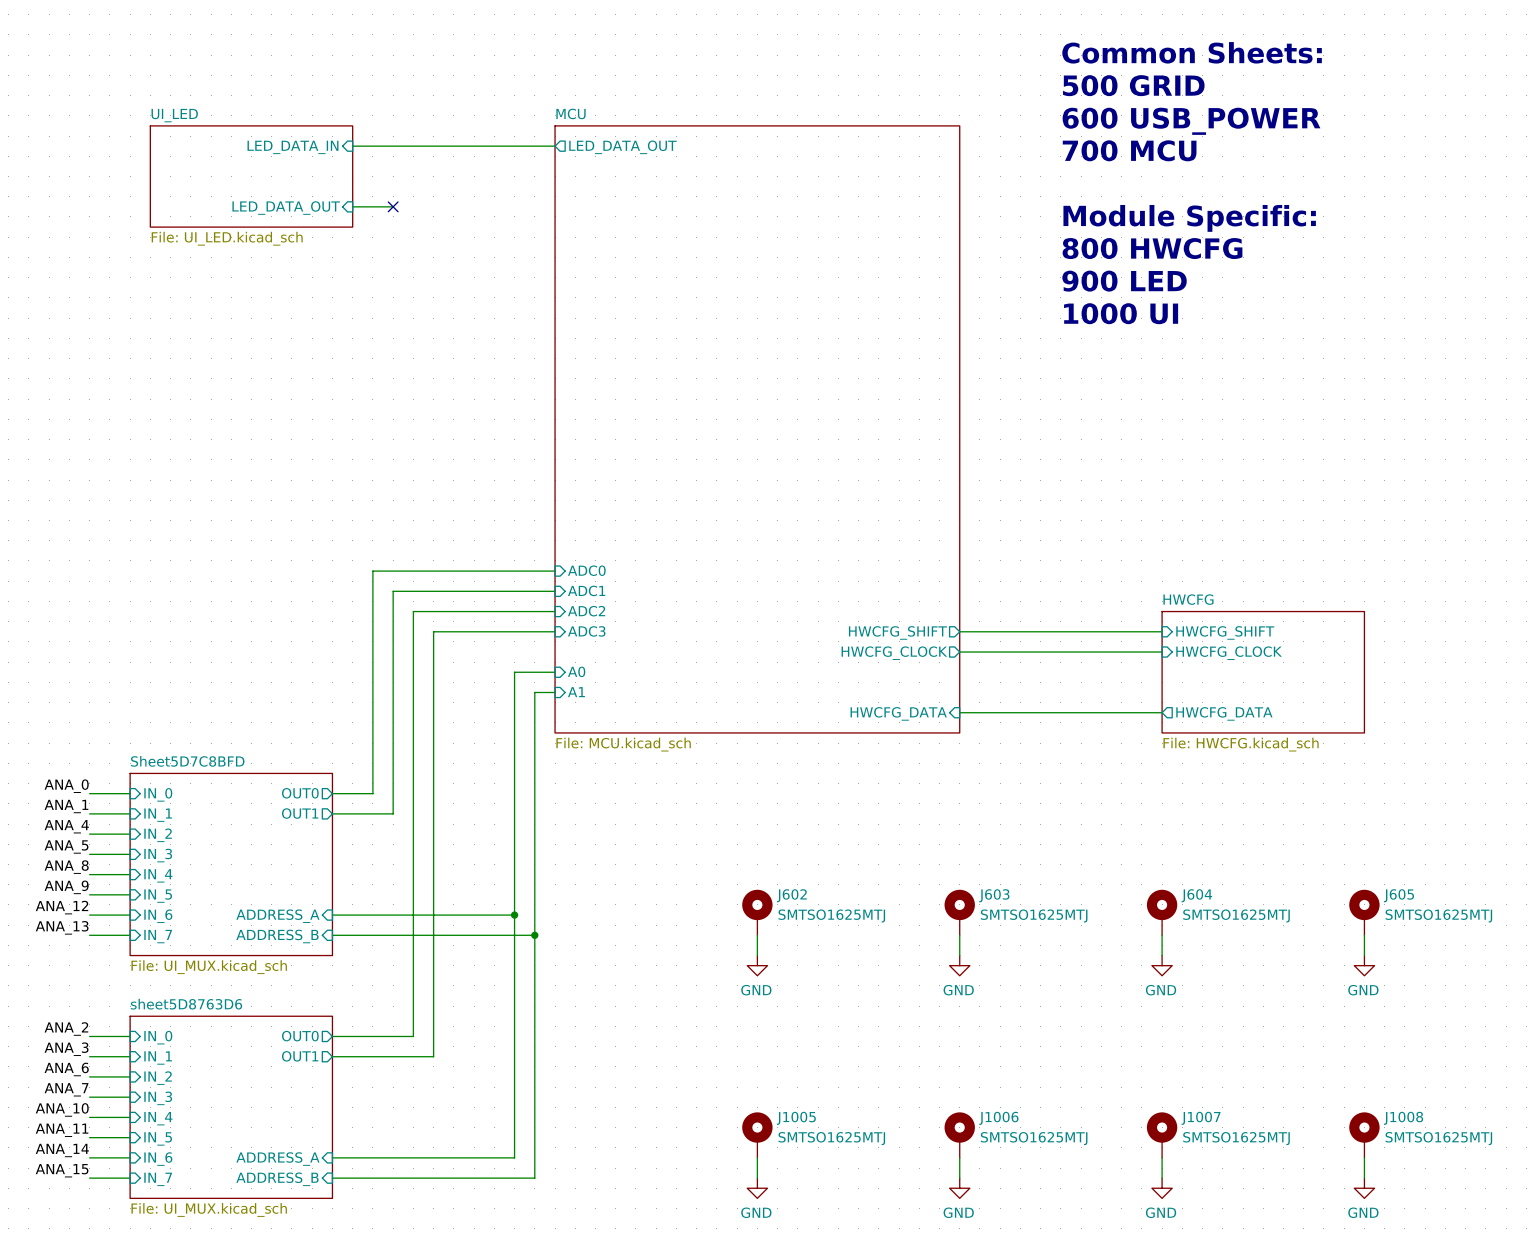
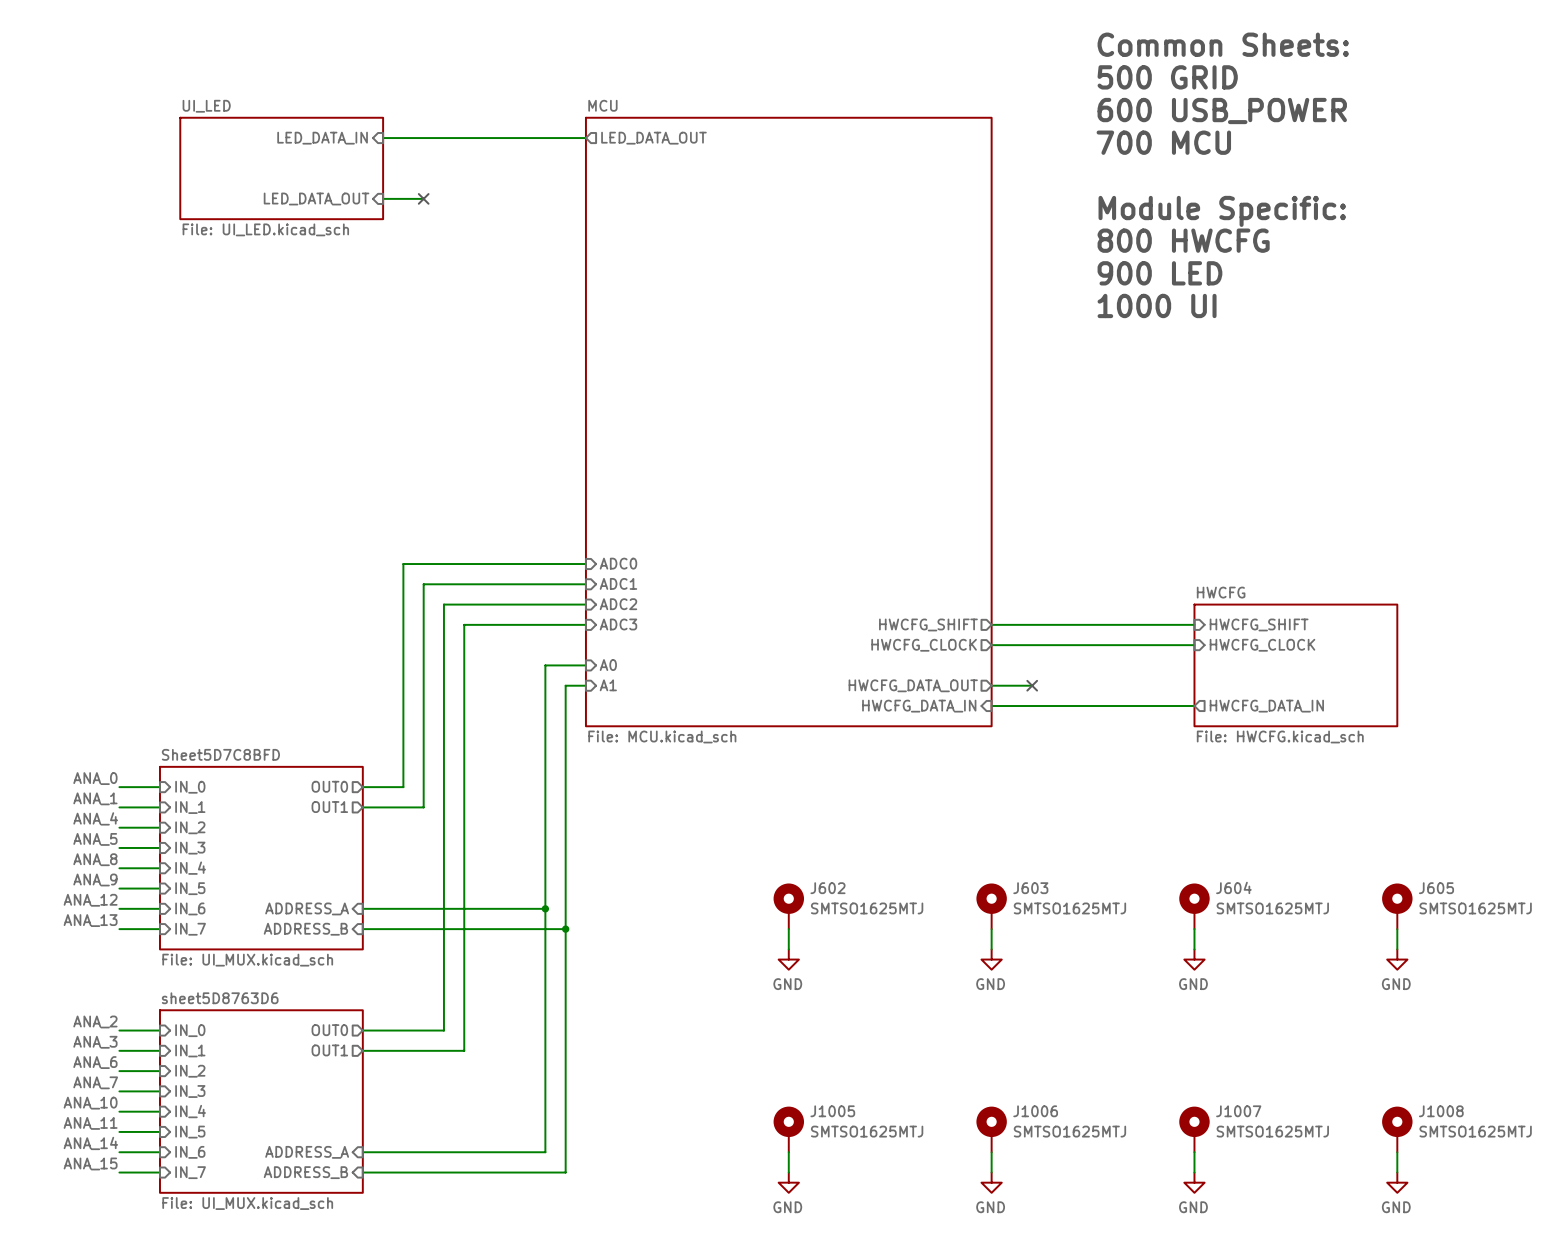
wire: none -> (991, 685) (1032, 685)
no-connect mark: none -> (1032, 685)
sheet pin: none -> HWCFG_DATA_OUT (913, 685)
sheet pin: HWCFG_DATA (898, 713) -> HWCFG_DATA_IN (919, 706)
sheet pin: HWCFG_DATA (1224, 713) -> HWCFG_DATA_IN (1266, 706)

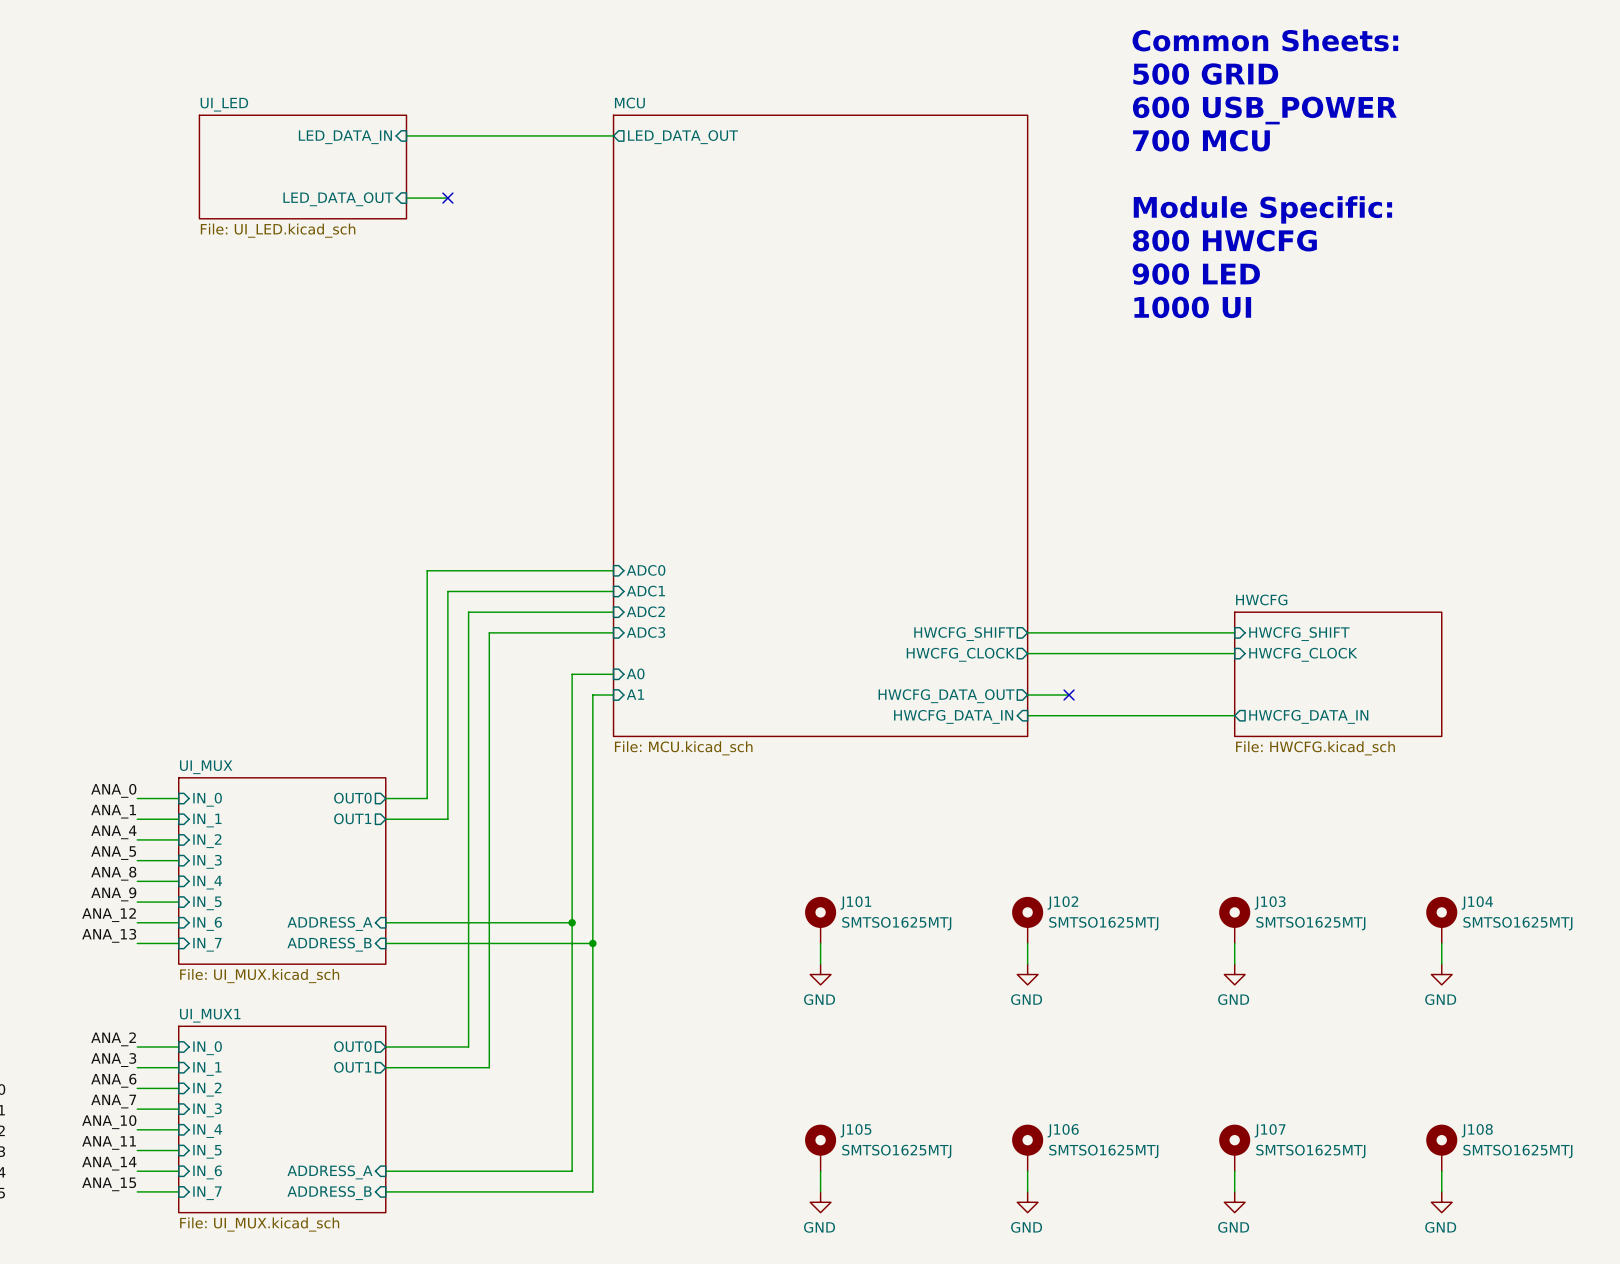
sheet Sheet5D7C8BFD name: Sheet5D7C8BFD (220, 754) -> UI_MUX (206, 767)
J604 name: J604 (1233, 887) -> J103 (1270, 903)
J602 name: J602 (827, 888) -> J101 (855, 903)
J603 name: J603 (1030, 888) -> J102 (1062, 903)
J605 name: J605 (1436, 888) -> J104 (1477, 903)
sheet sheet5D8763D6 name: sheet5D8763D6 (220, 998) -> UI_MUX1 (210, 1015)
J1005 name: J1005 (832, 1111) -> J105 (855, 1130)
J1006 name: J1006 (1035, 1111) -> J106 (1063, 1130)
J1007 name: J1007 (1238, 1111) -> J107 (1270, 1130)
J1008 name: J1008 (1441, 1111) -> J108 (1477, 1130)

